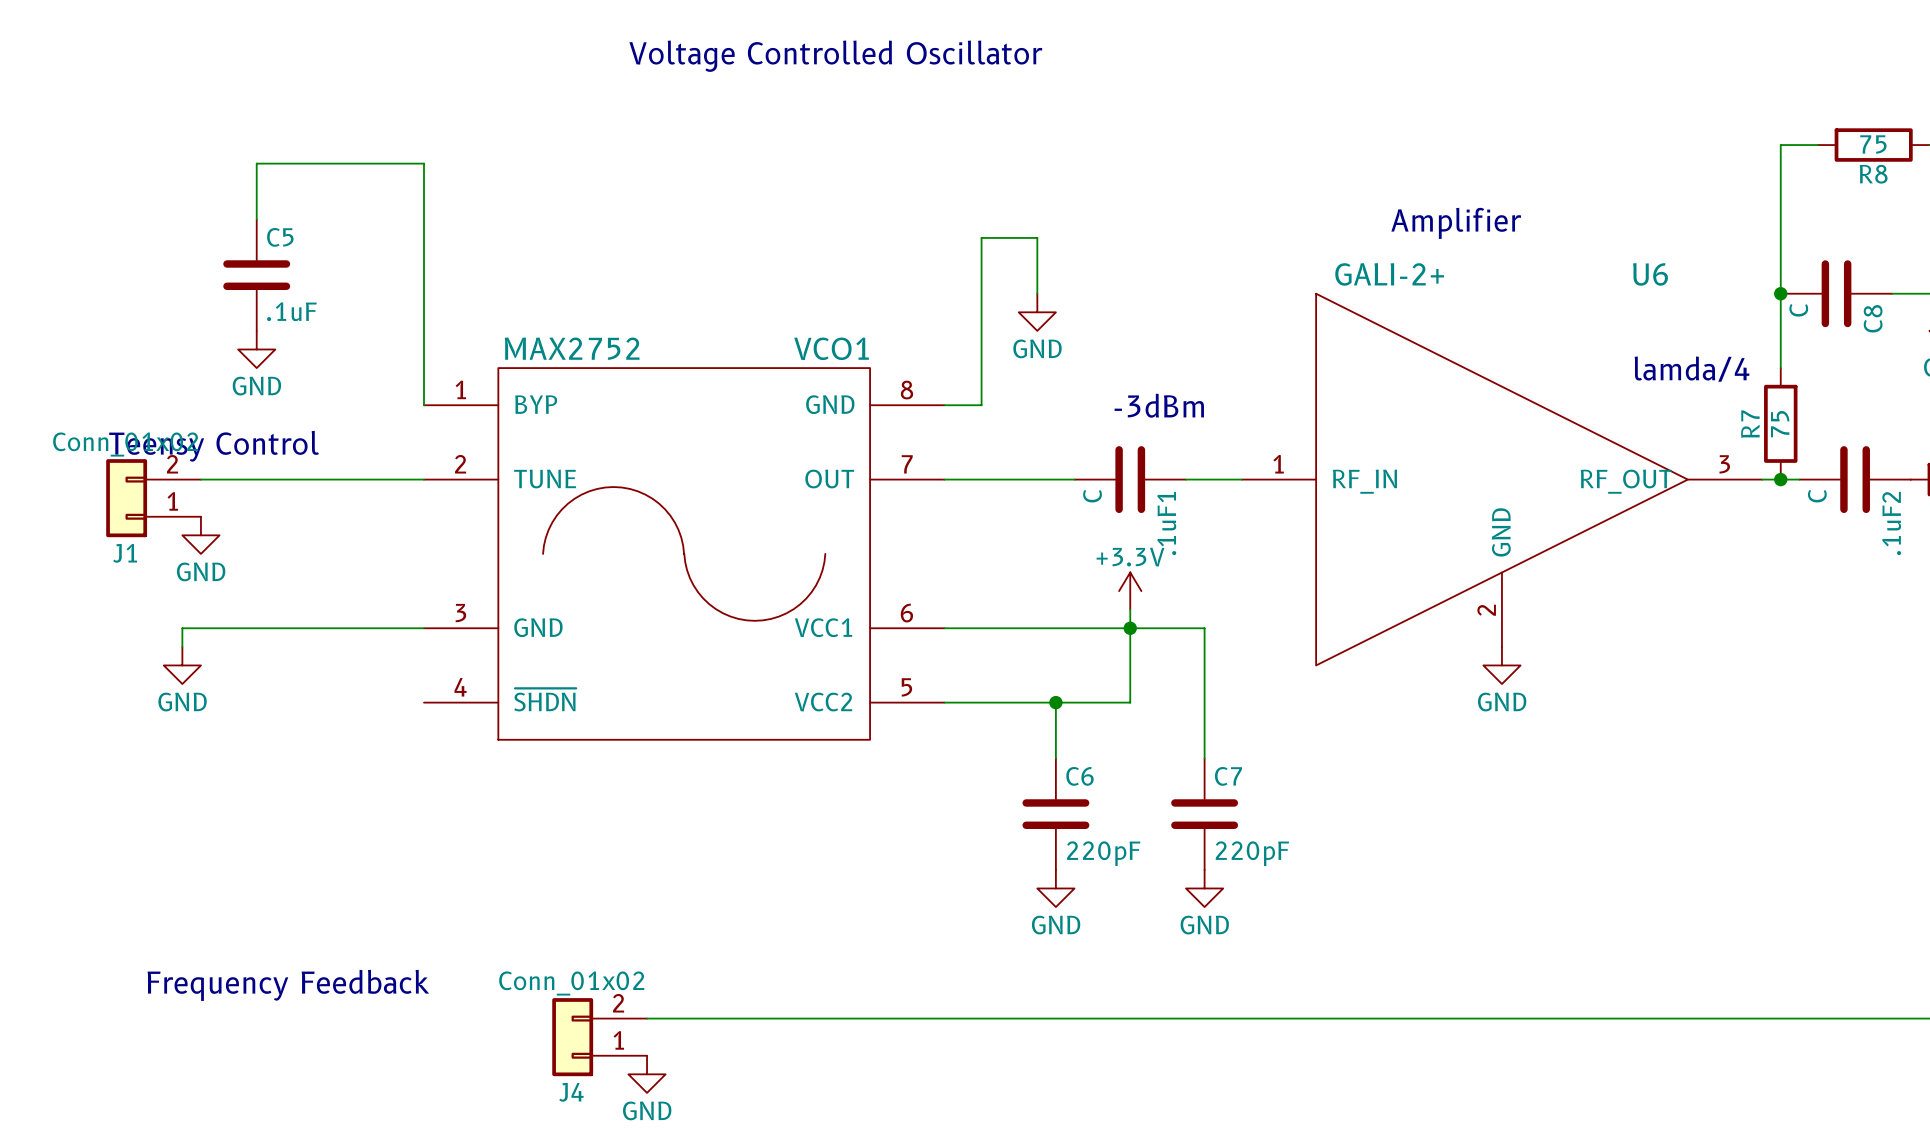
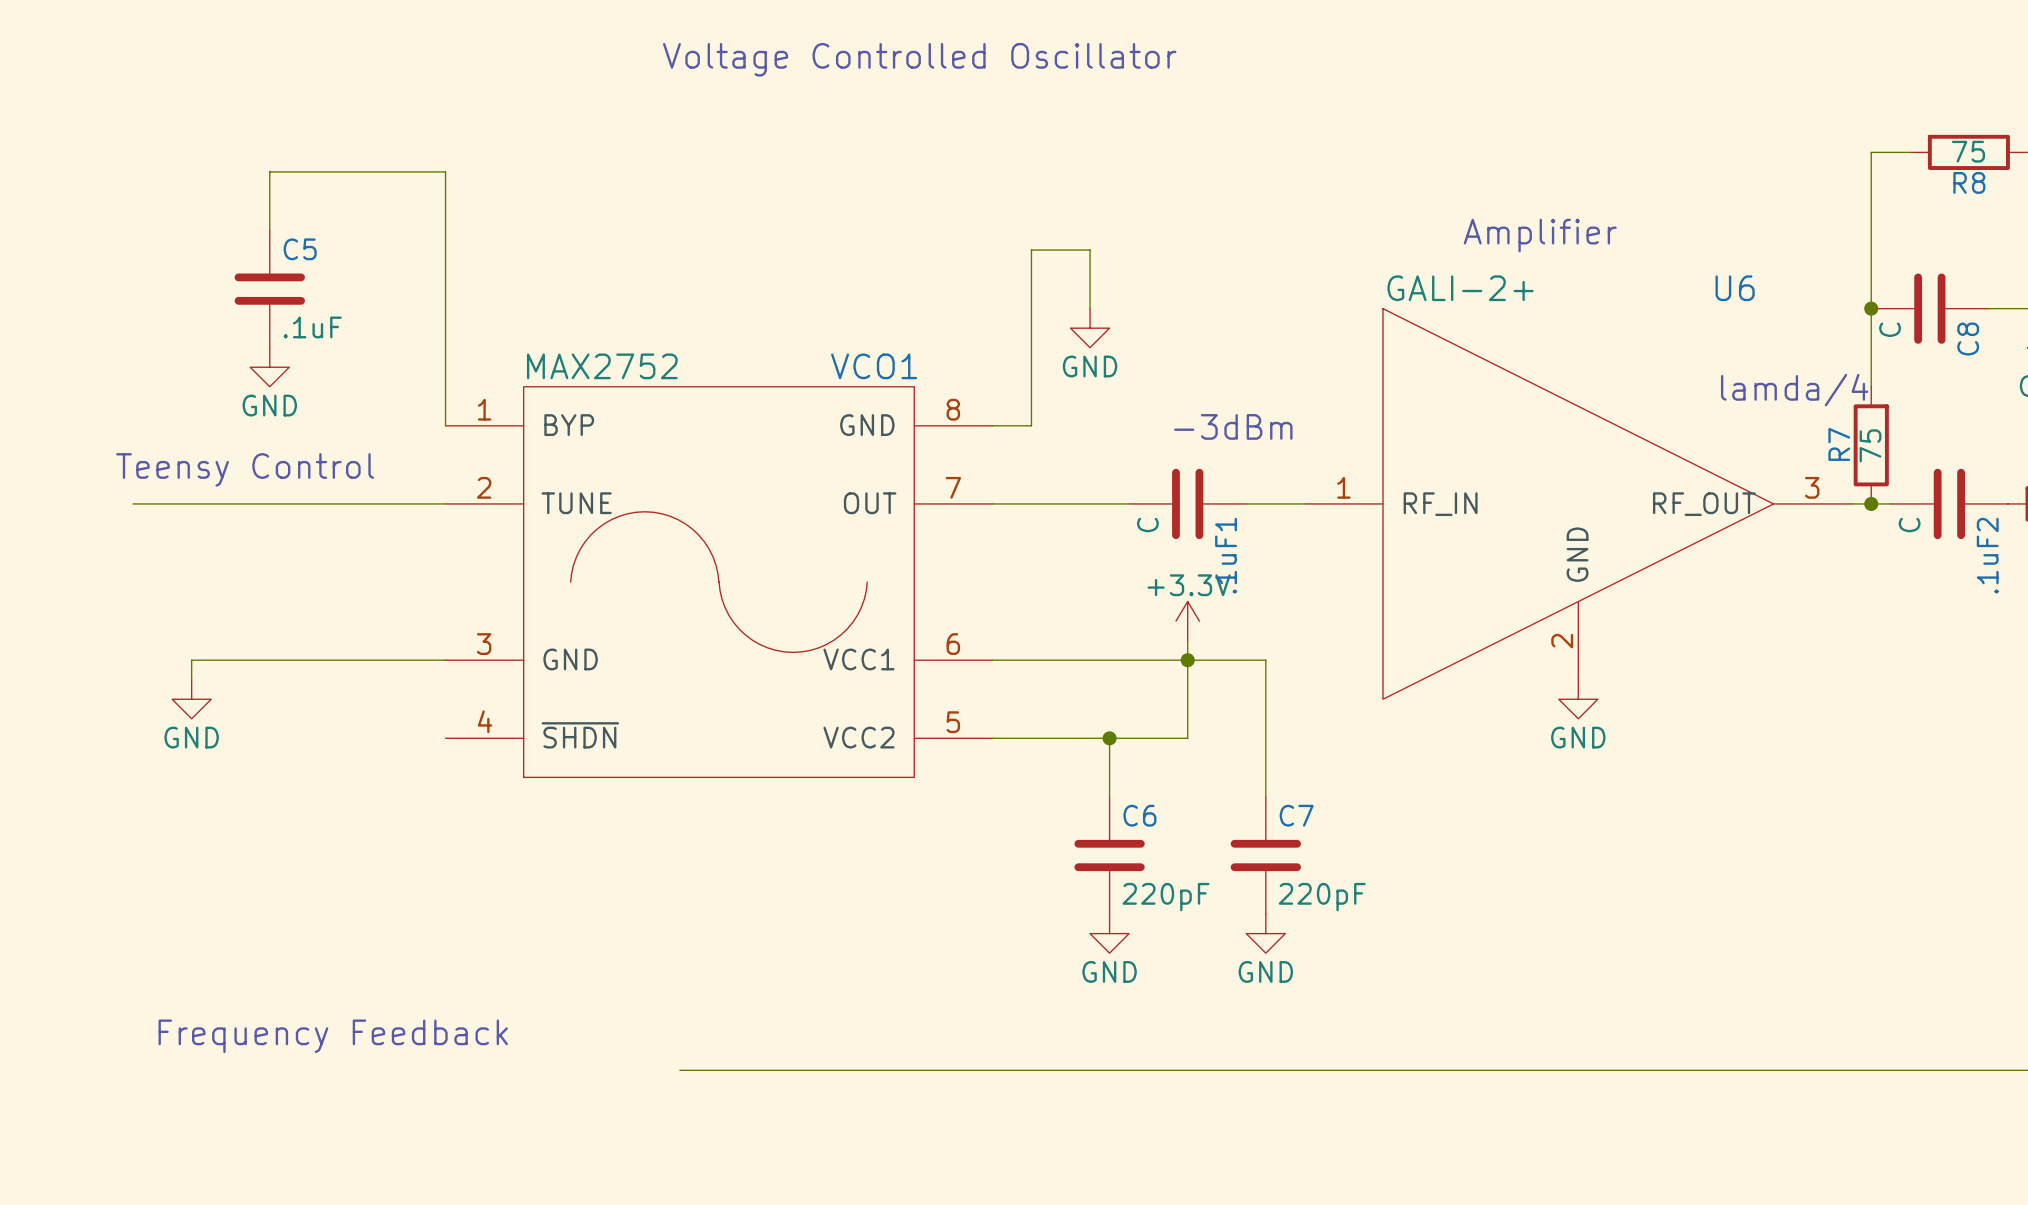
J1: Conn_01x02 (153, 498) -> none
power symbol: GND (200, 535) -> none
J4: Conn_01x02 (599, 1037) -> none
power symbol: GND (647, 1074) -> none

